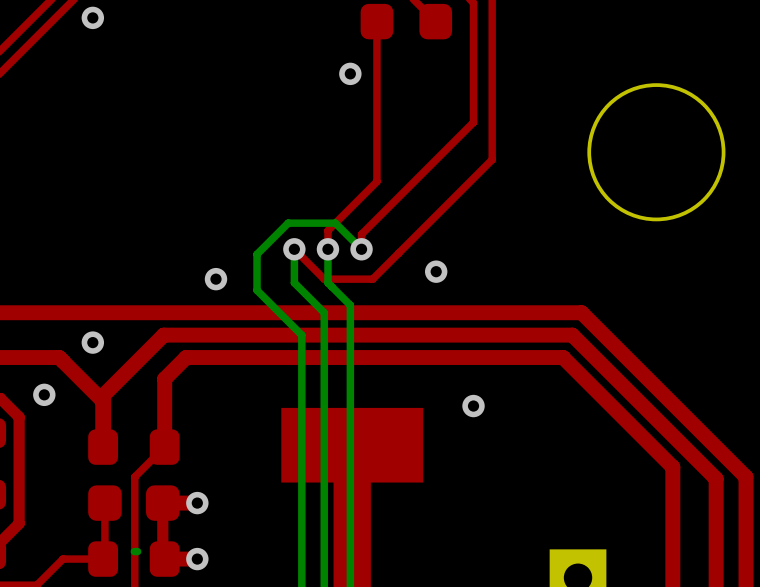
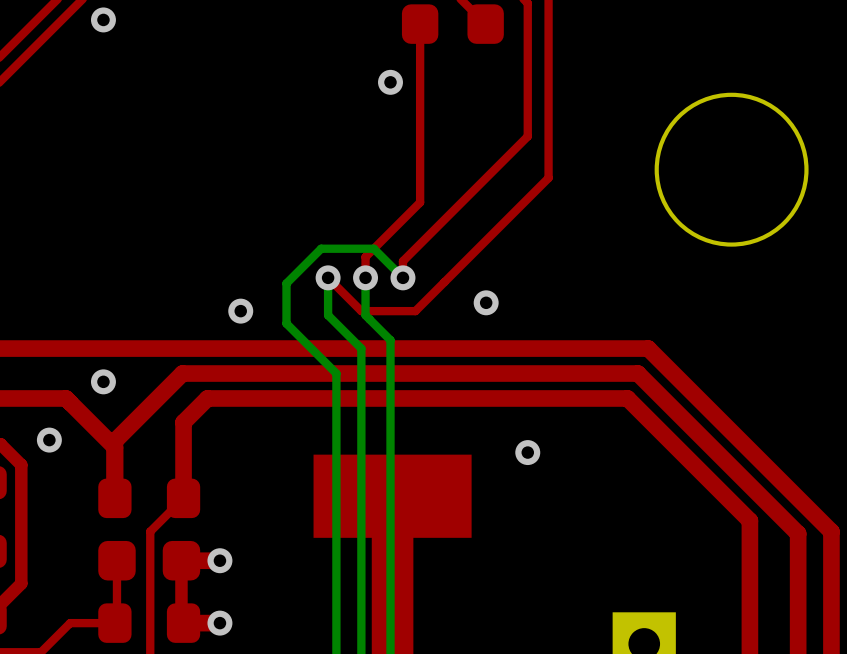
bottom track: (137, 551) (134, 551) -> none

